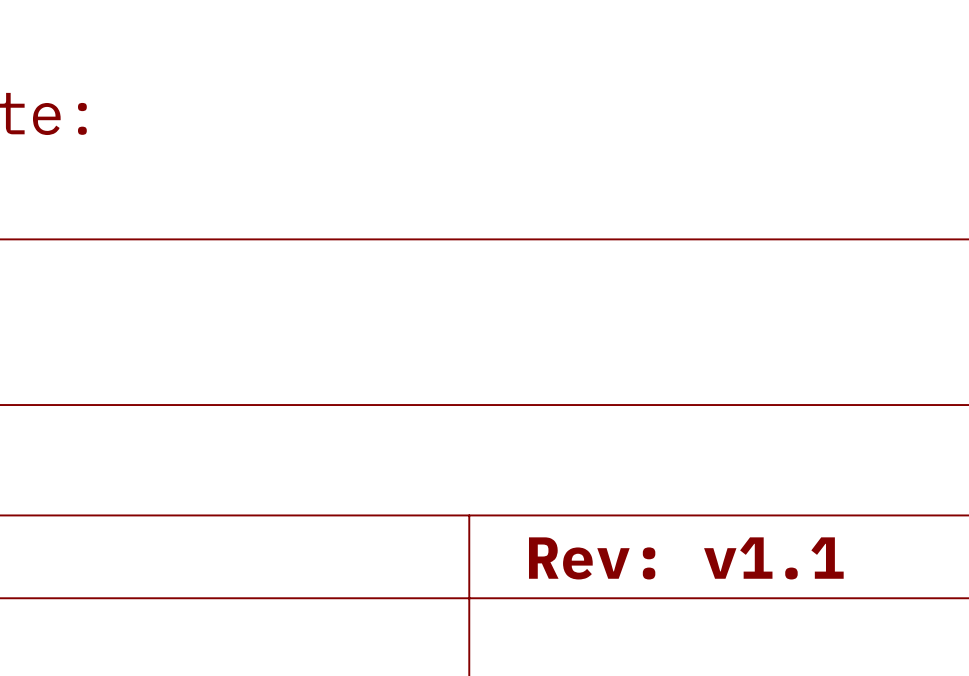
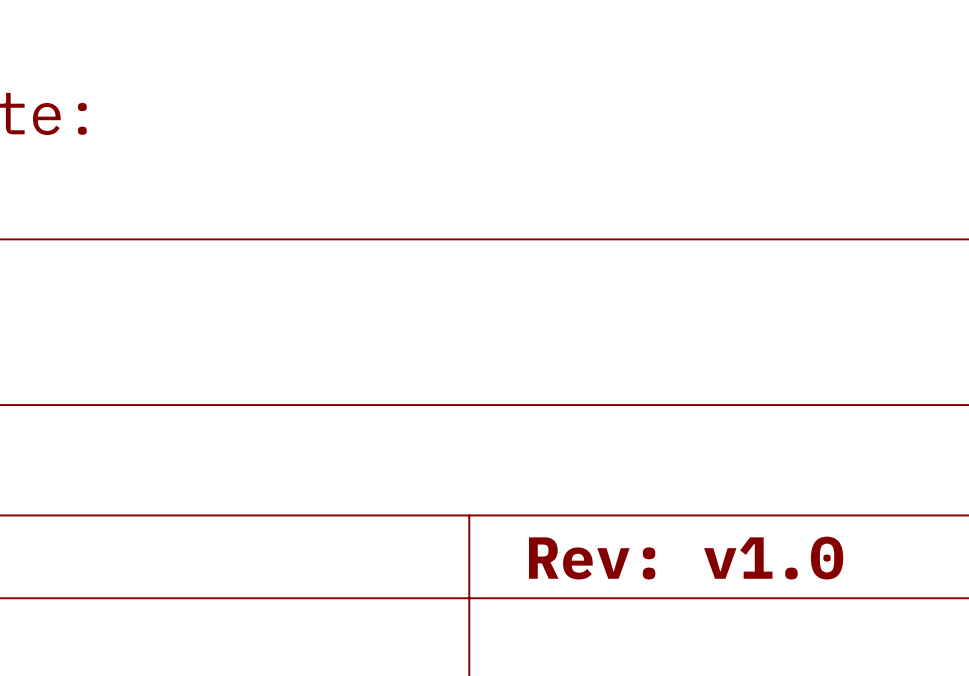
title block: Rev: v1.1 (686, 558) -> Rev: v1.0 (686, 558)

